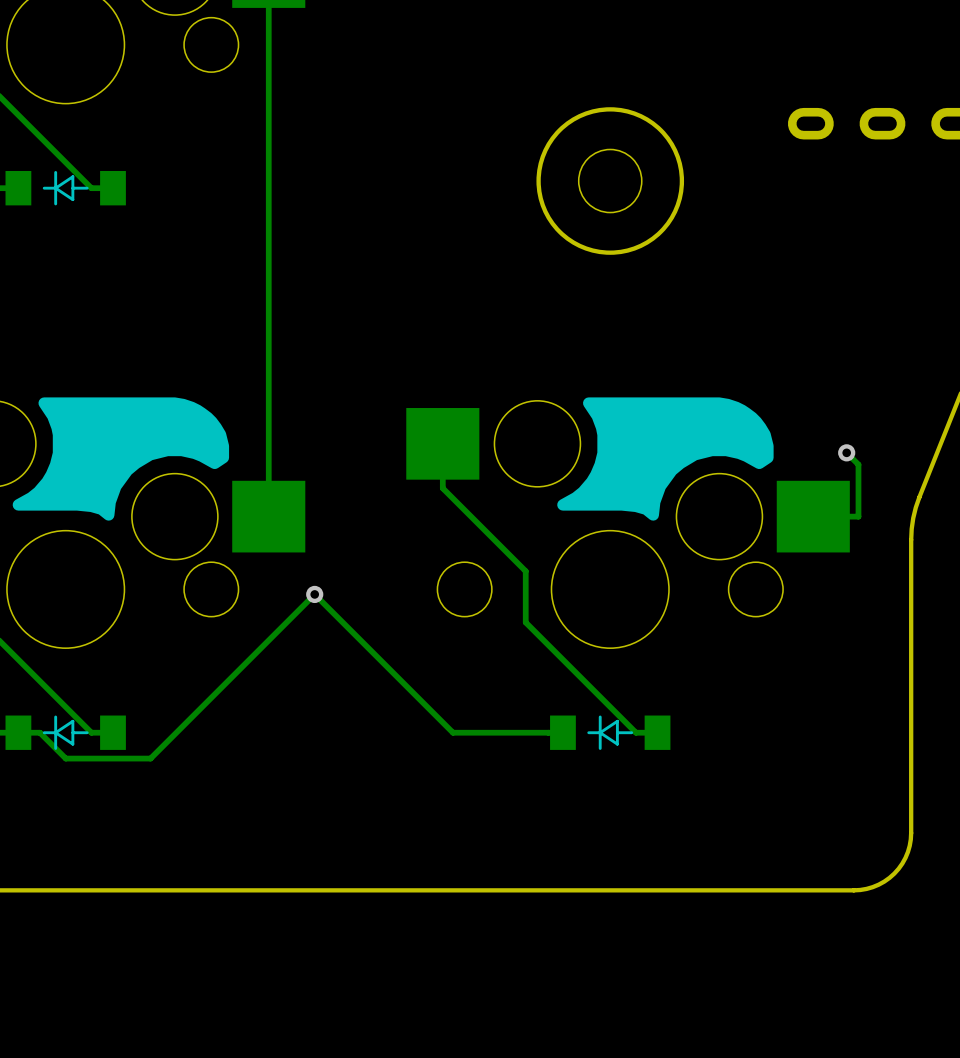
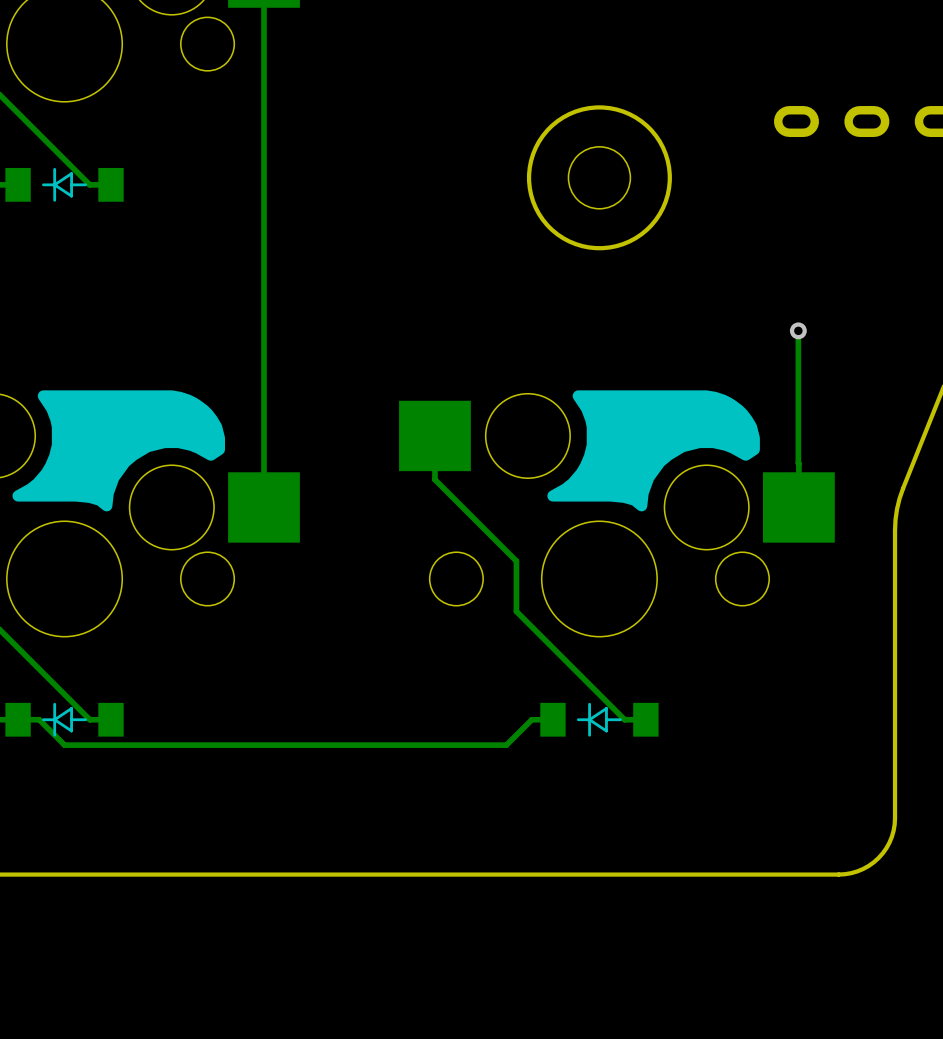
track: (846, 452) (858, 464) (858, 516) (813, 516) -> (798, 330) (798, 507)
via position: (846, 452) -> (798, 330)
via: (314, 594) -> none
track: (541, 732) (453, 732) (314, 594) (150, 758) -> (531, 719) (506, 745) (147, 745)

